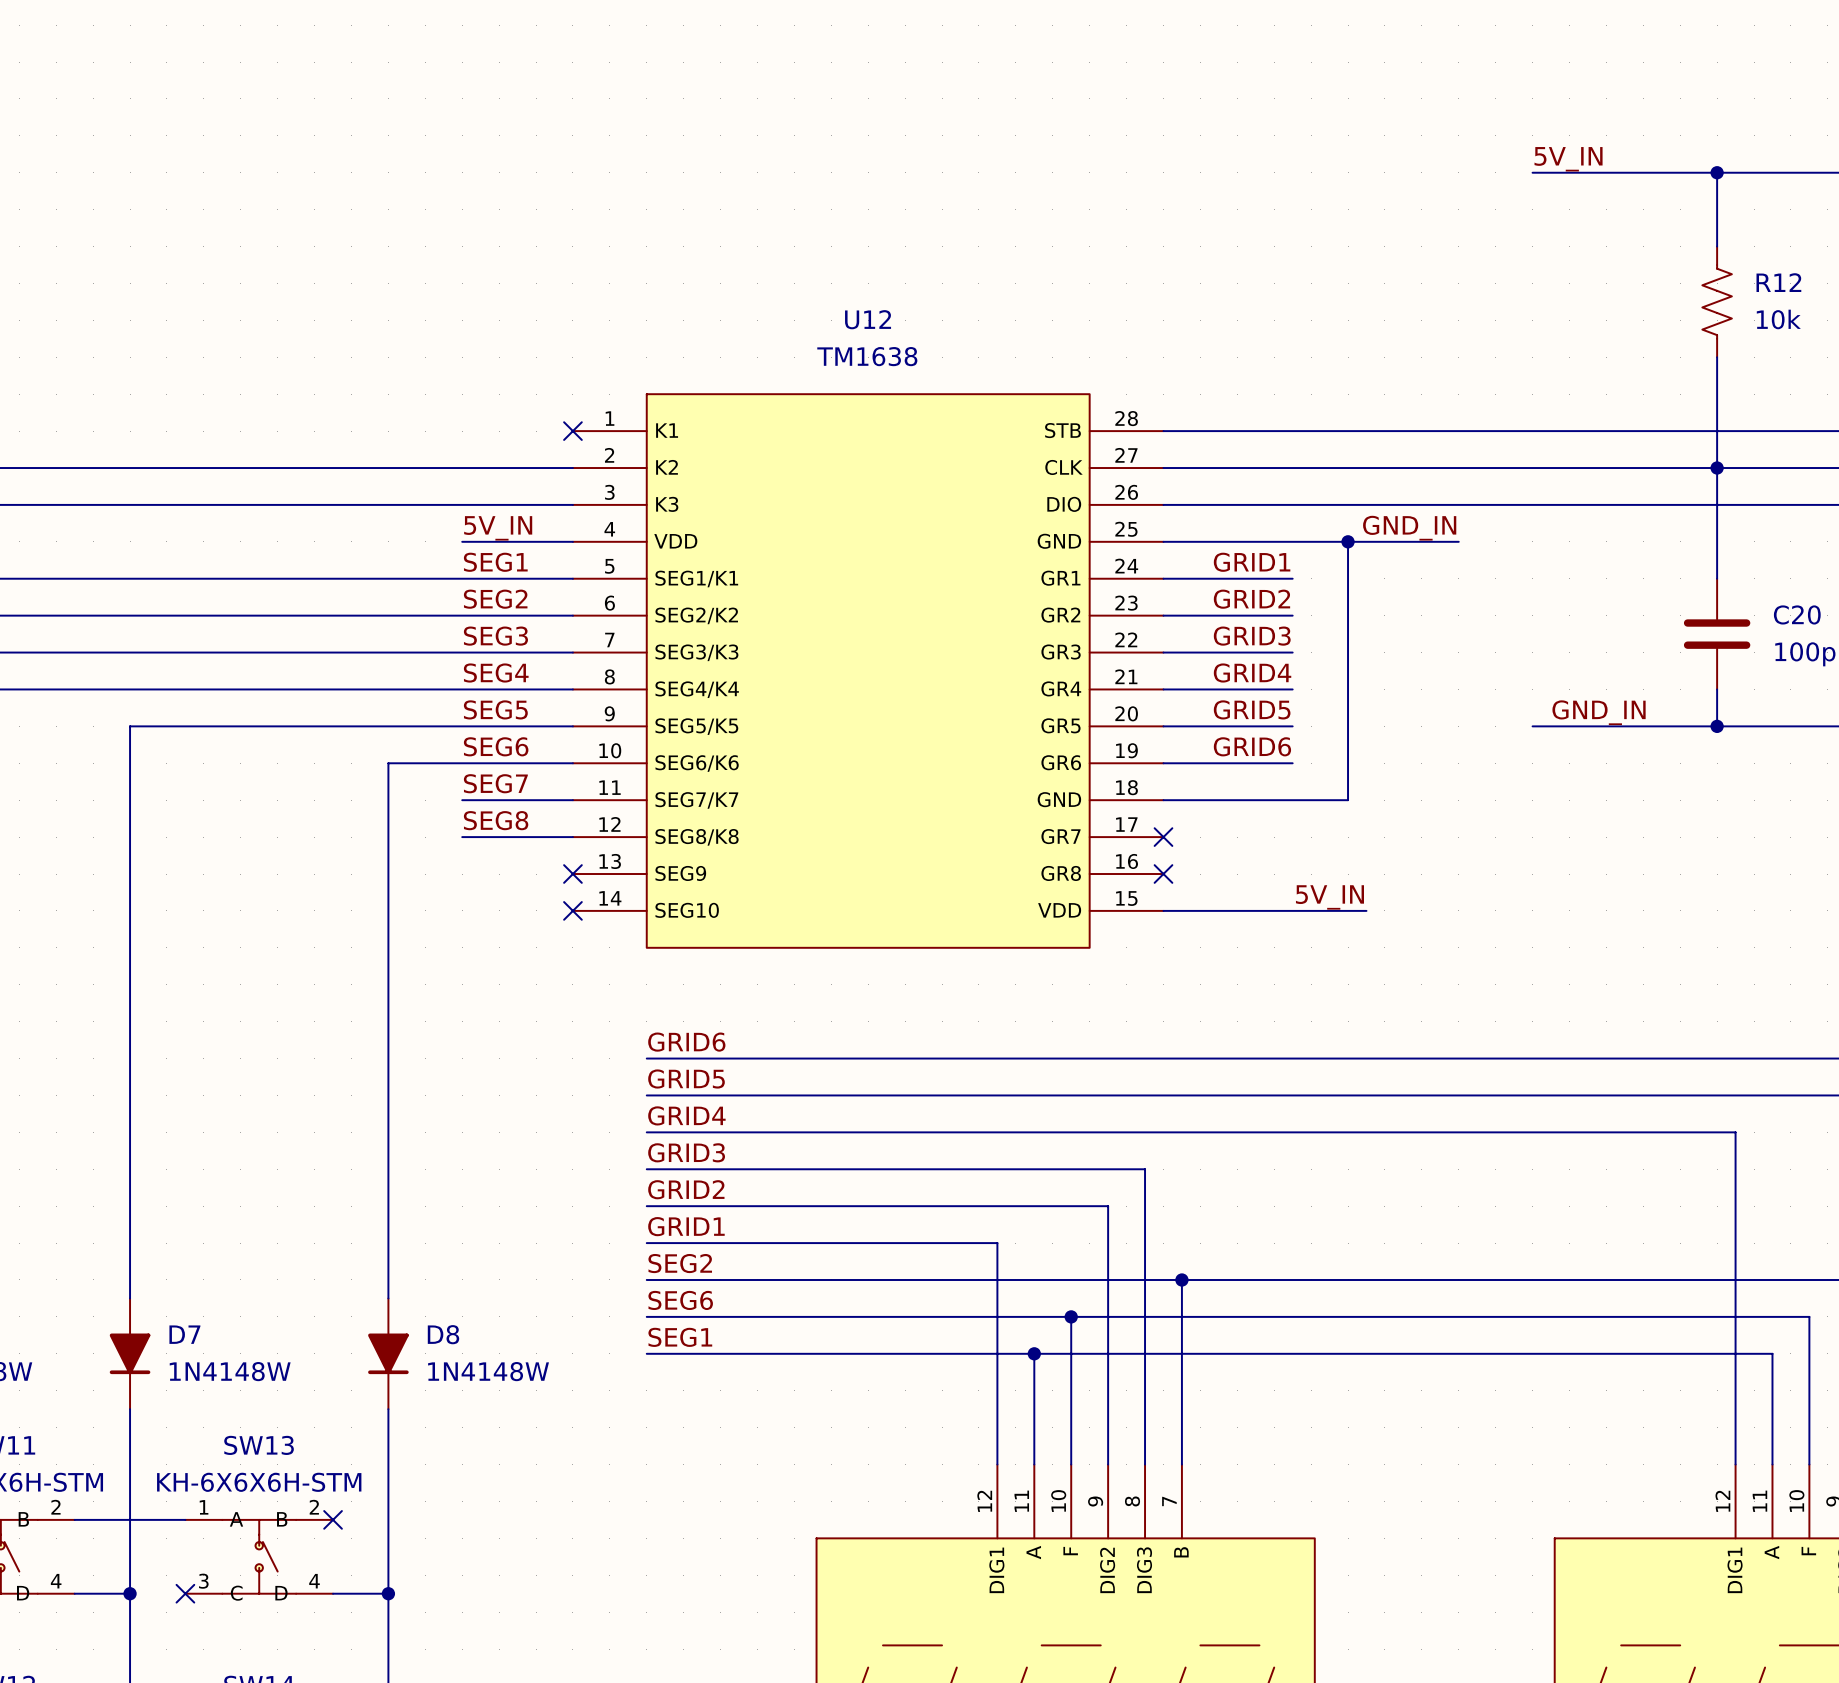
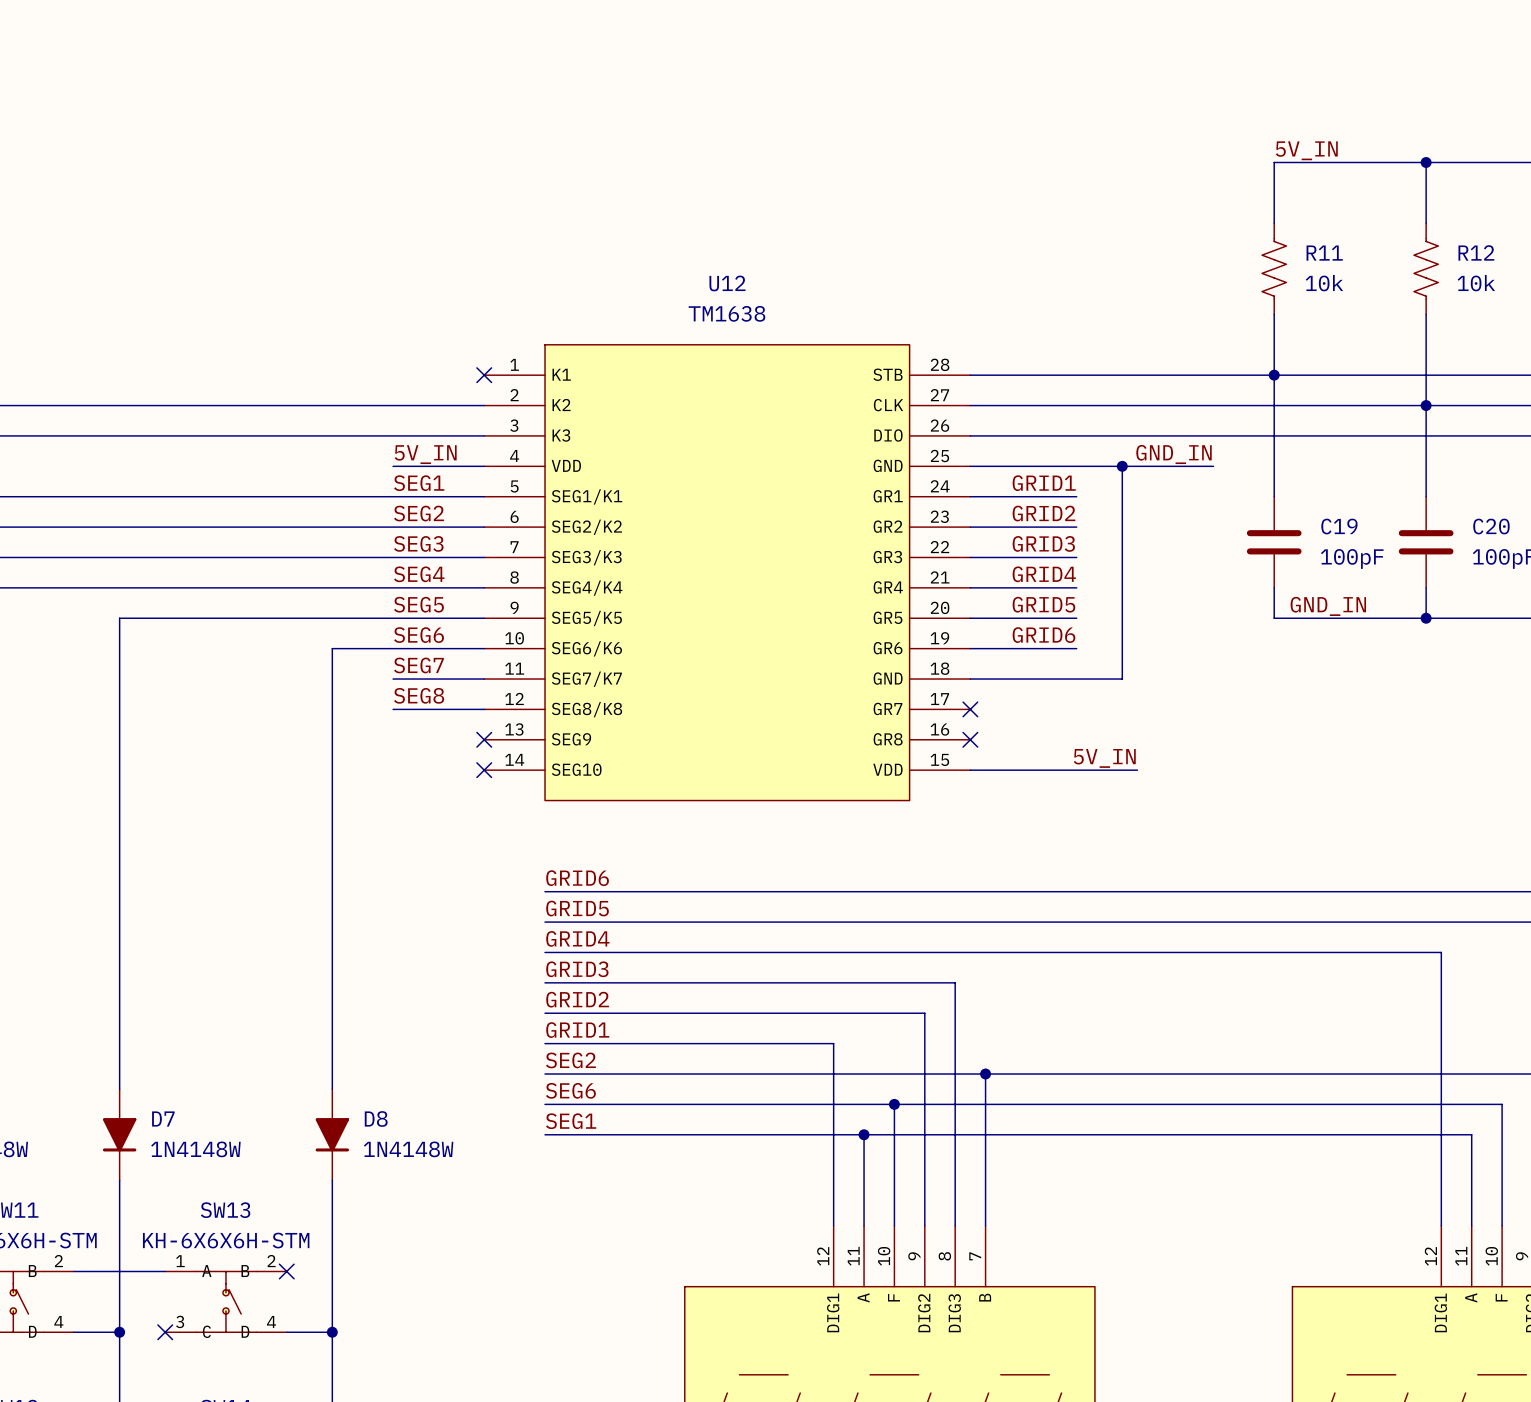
wire: none -> (1274, 162) (1274, 223)
R11: none -> 10k (1274, 268)
wire: none -> (1274, 314) (1274, 496)
junction: none -> (1274, 375)
C19: none -> 100pF (1274, 542)
wire: none -> (1274, 587) (1274, 618)

